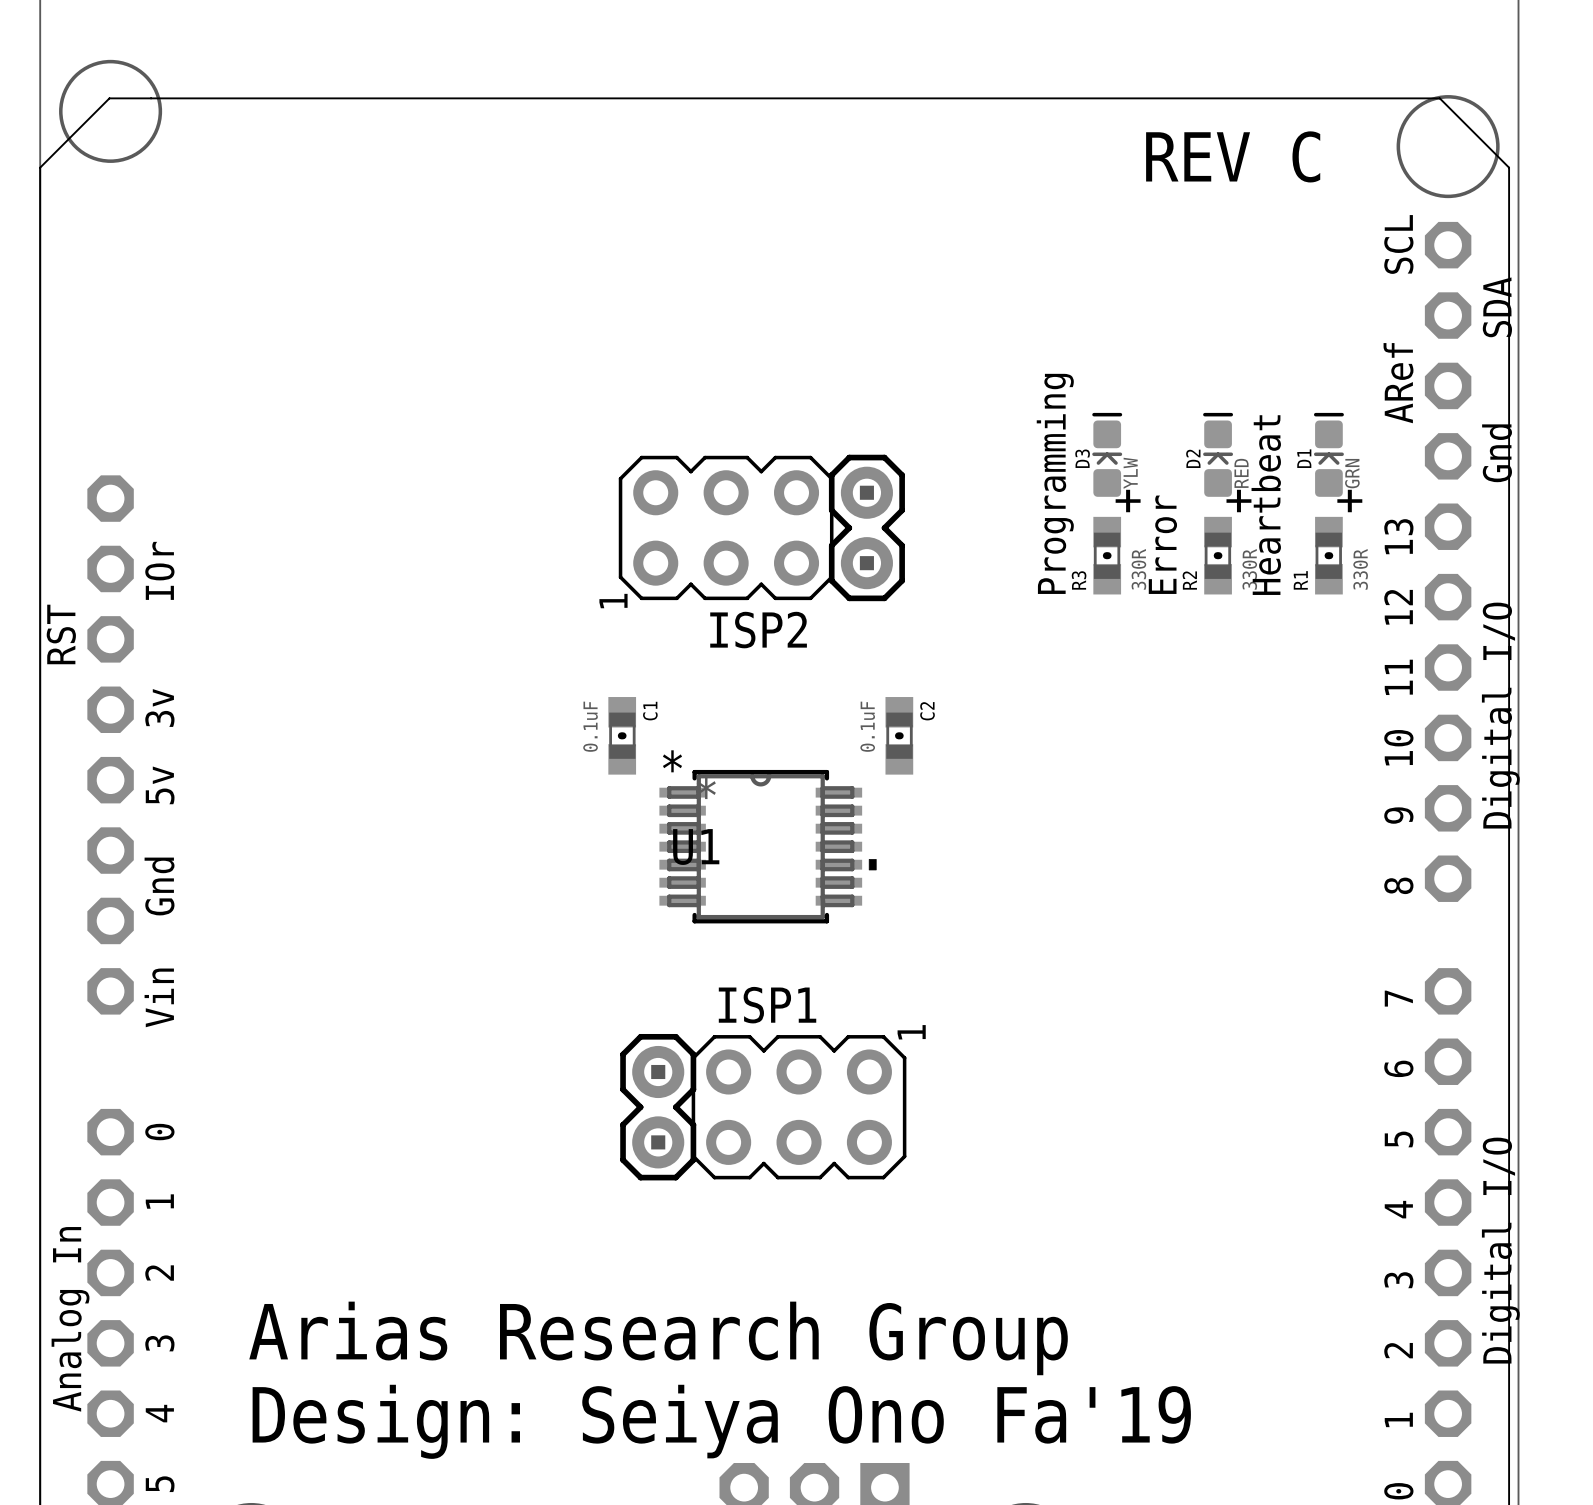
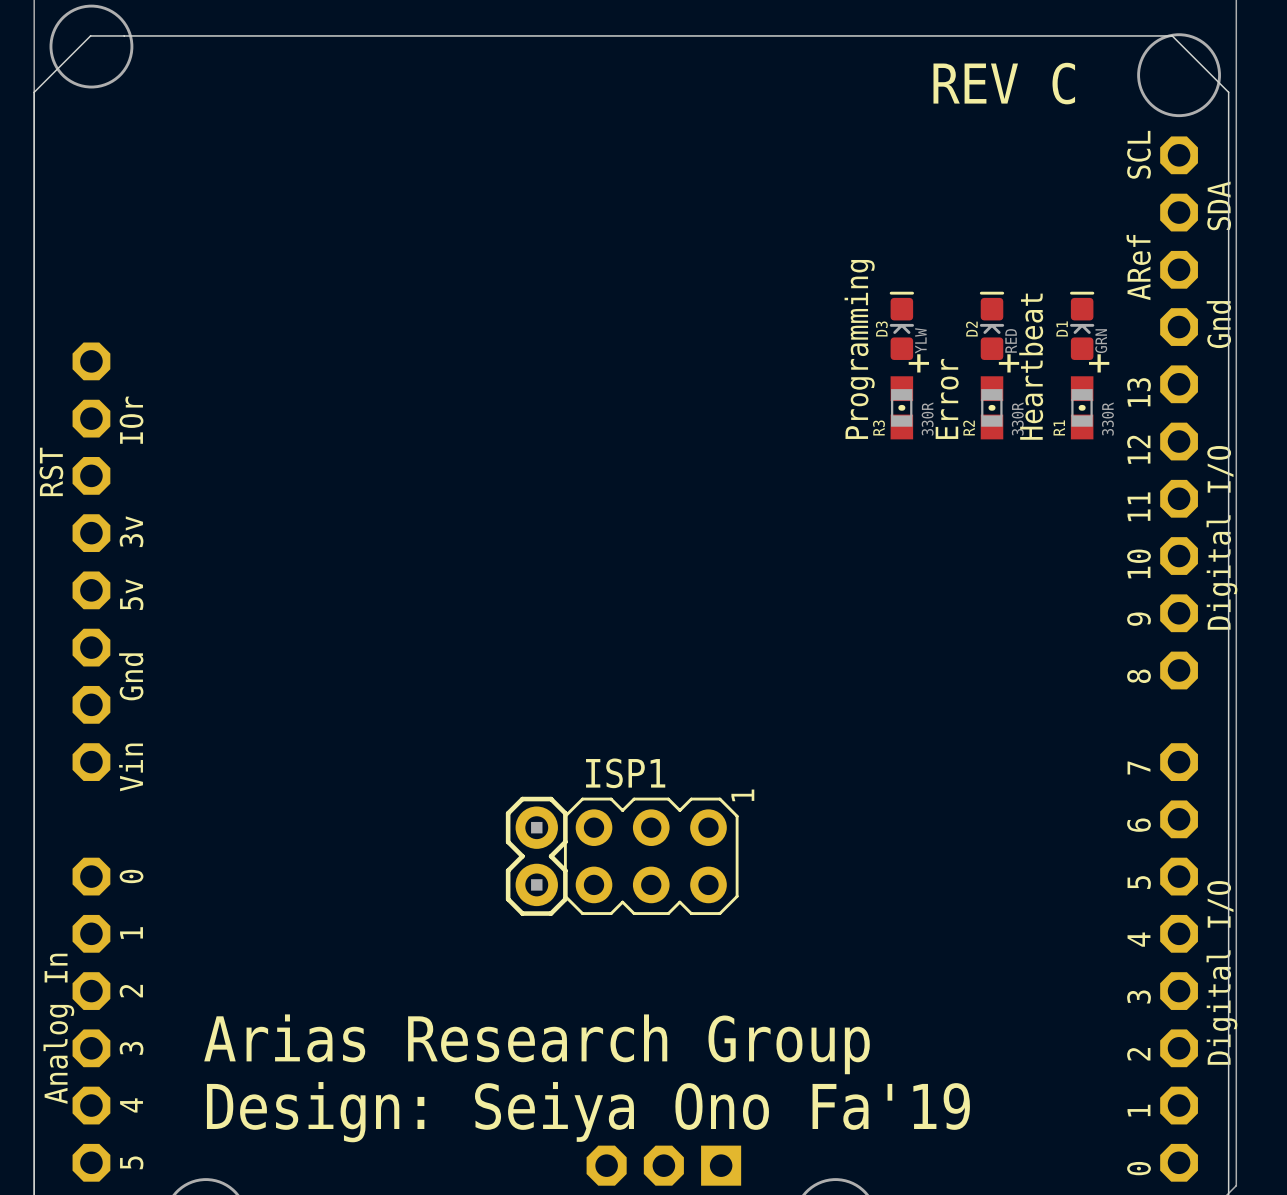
ISP2: (726, 527) -> none
part: (866, 527) -> none
C1: 0.1uF (622, 735) -> none
C2: 0.1uF (899, 735) -> none
U1: (767, 846) -> none

